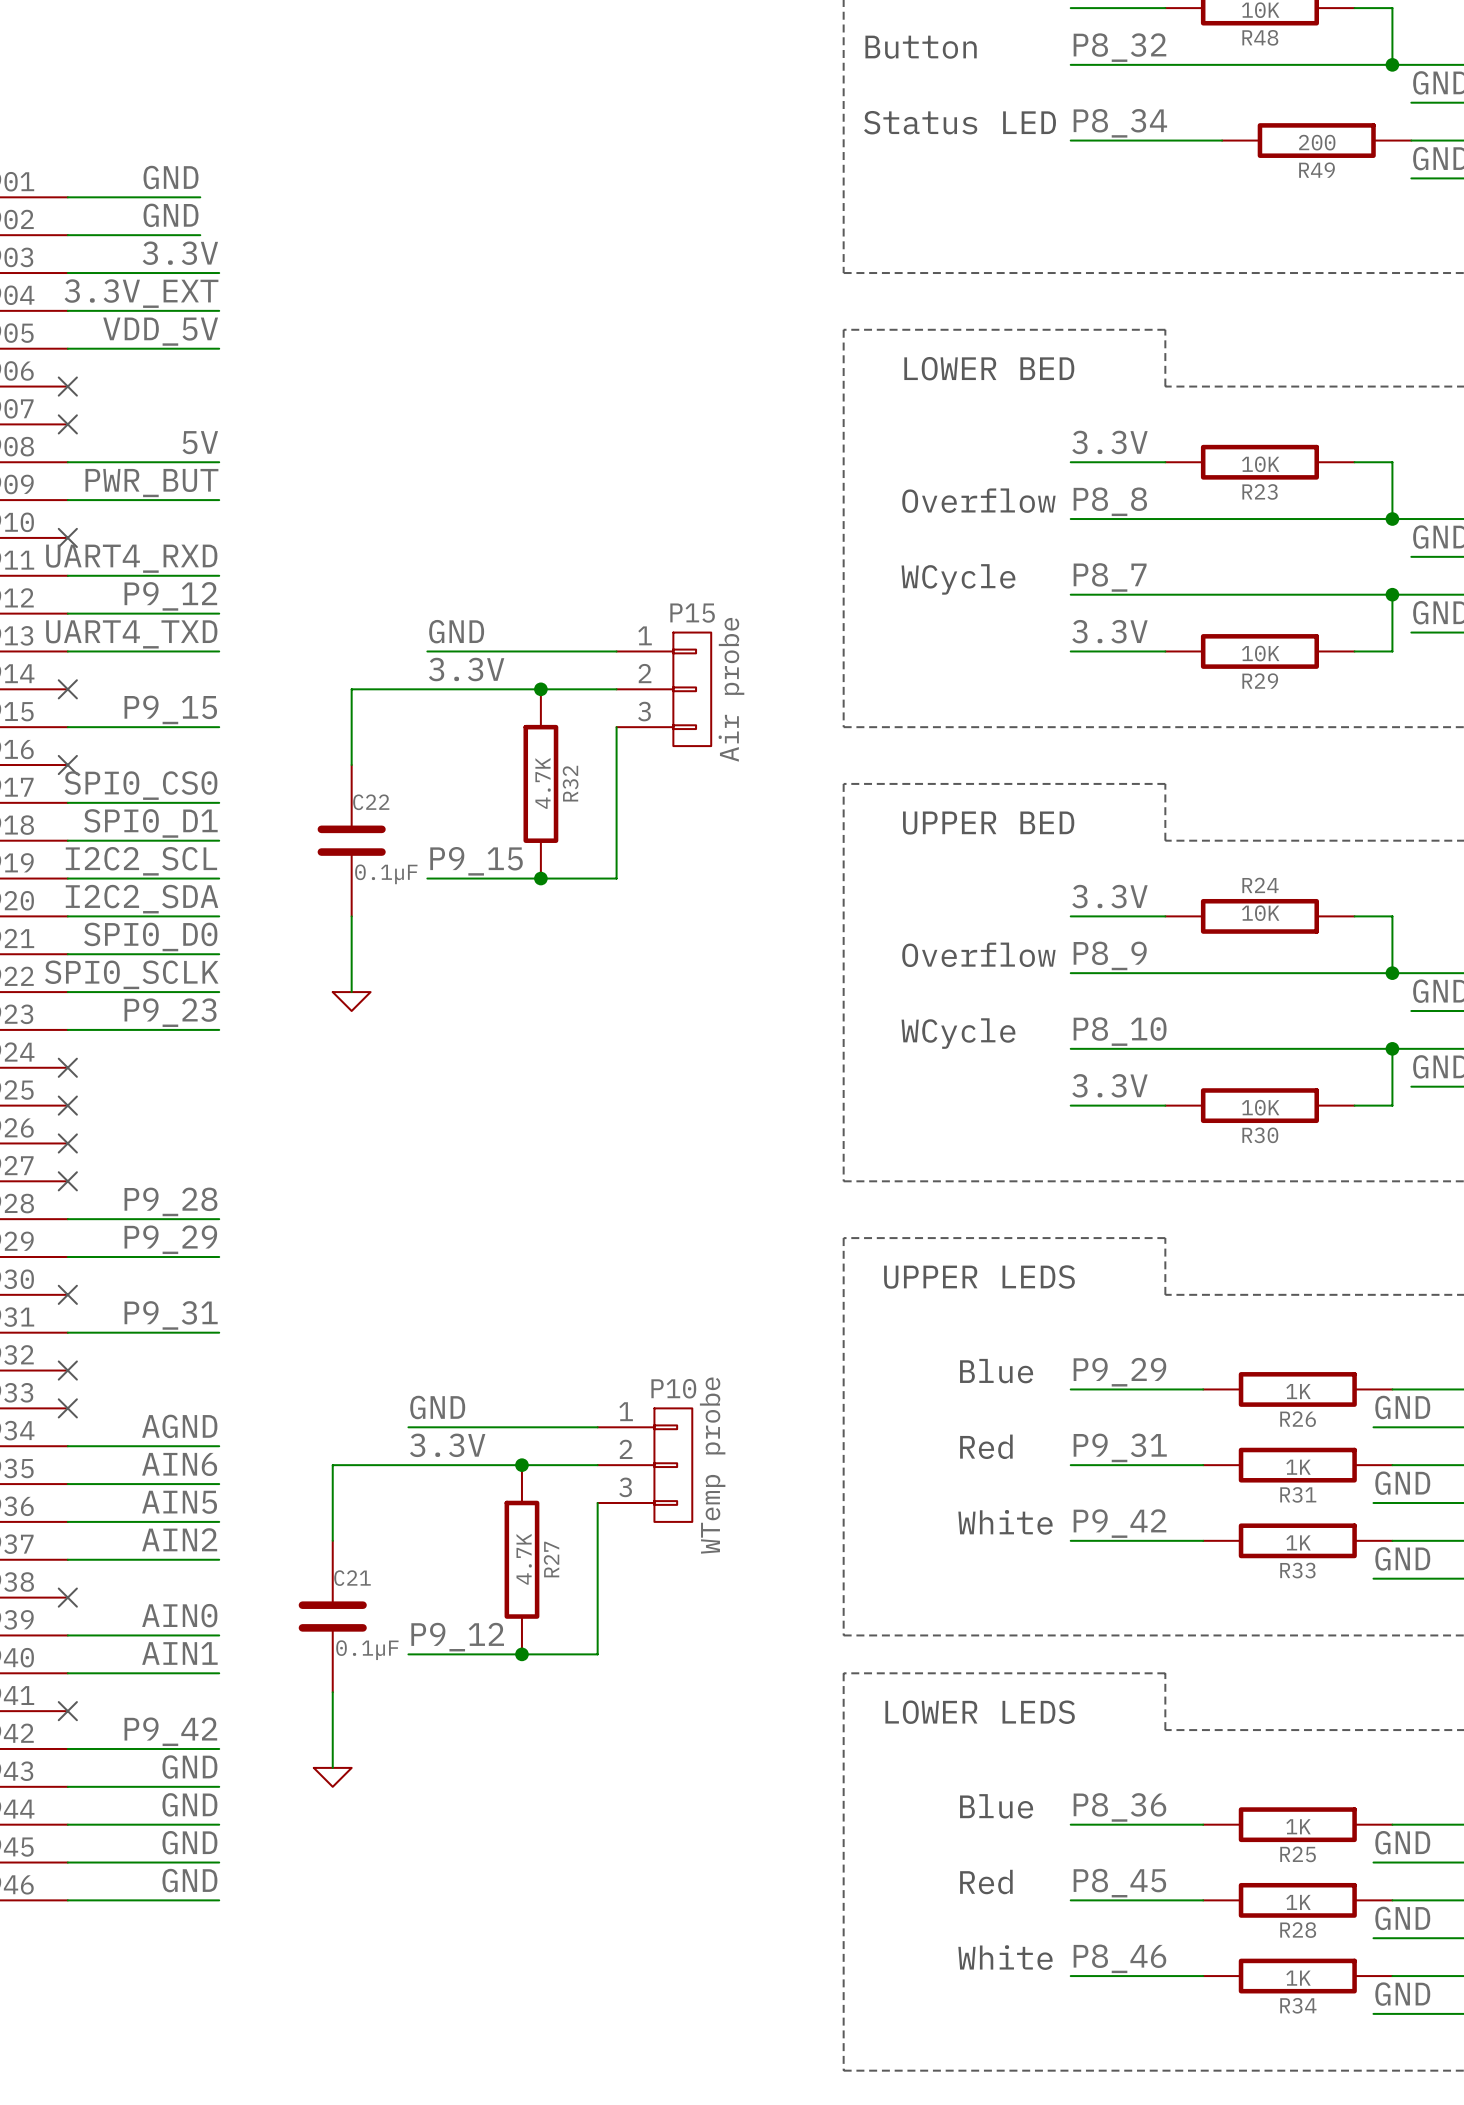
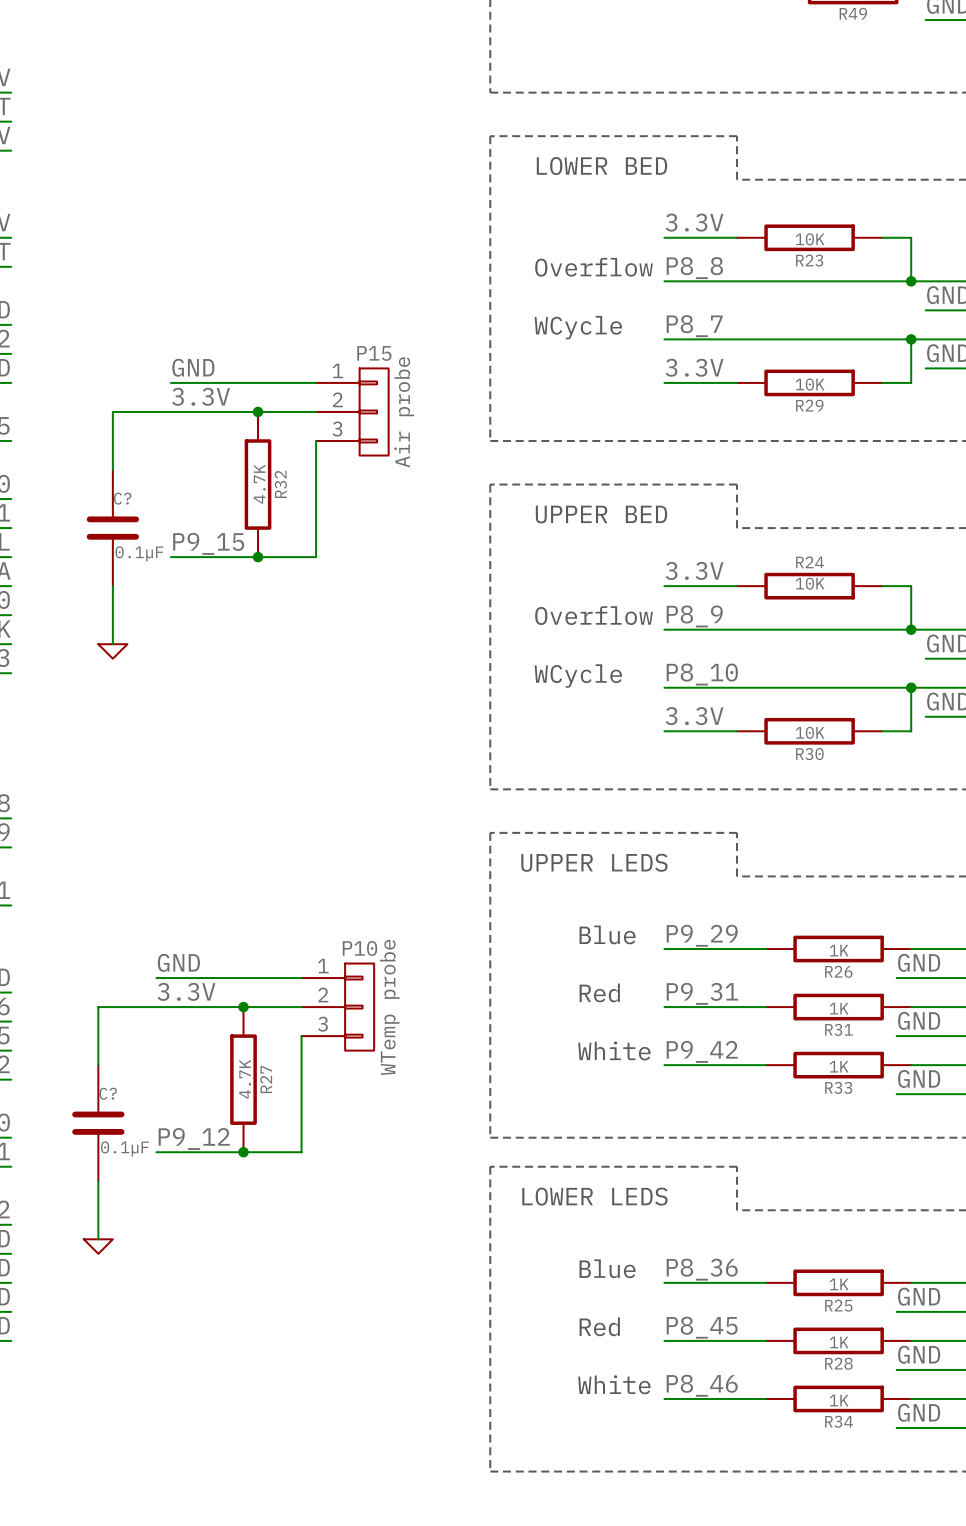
C22 name: C22 (371, 802) -> C? (122, 498)
C21 name: C21 (352, 1578) -> C? (108, 1093)

